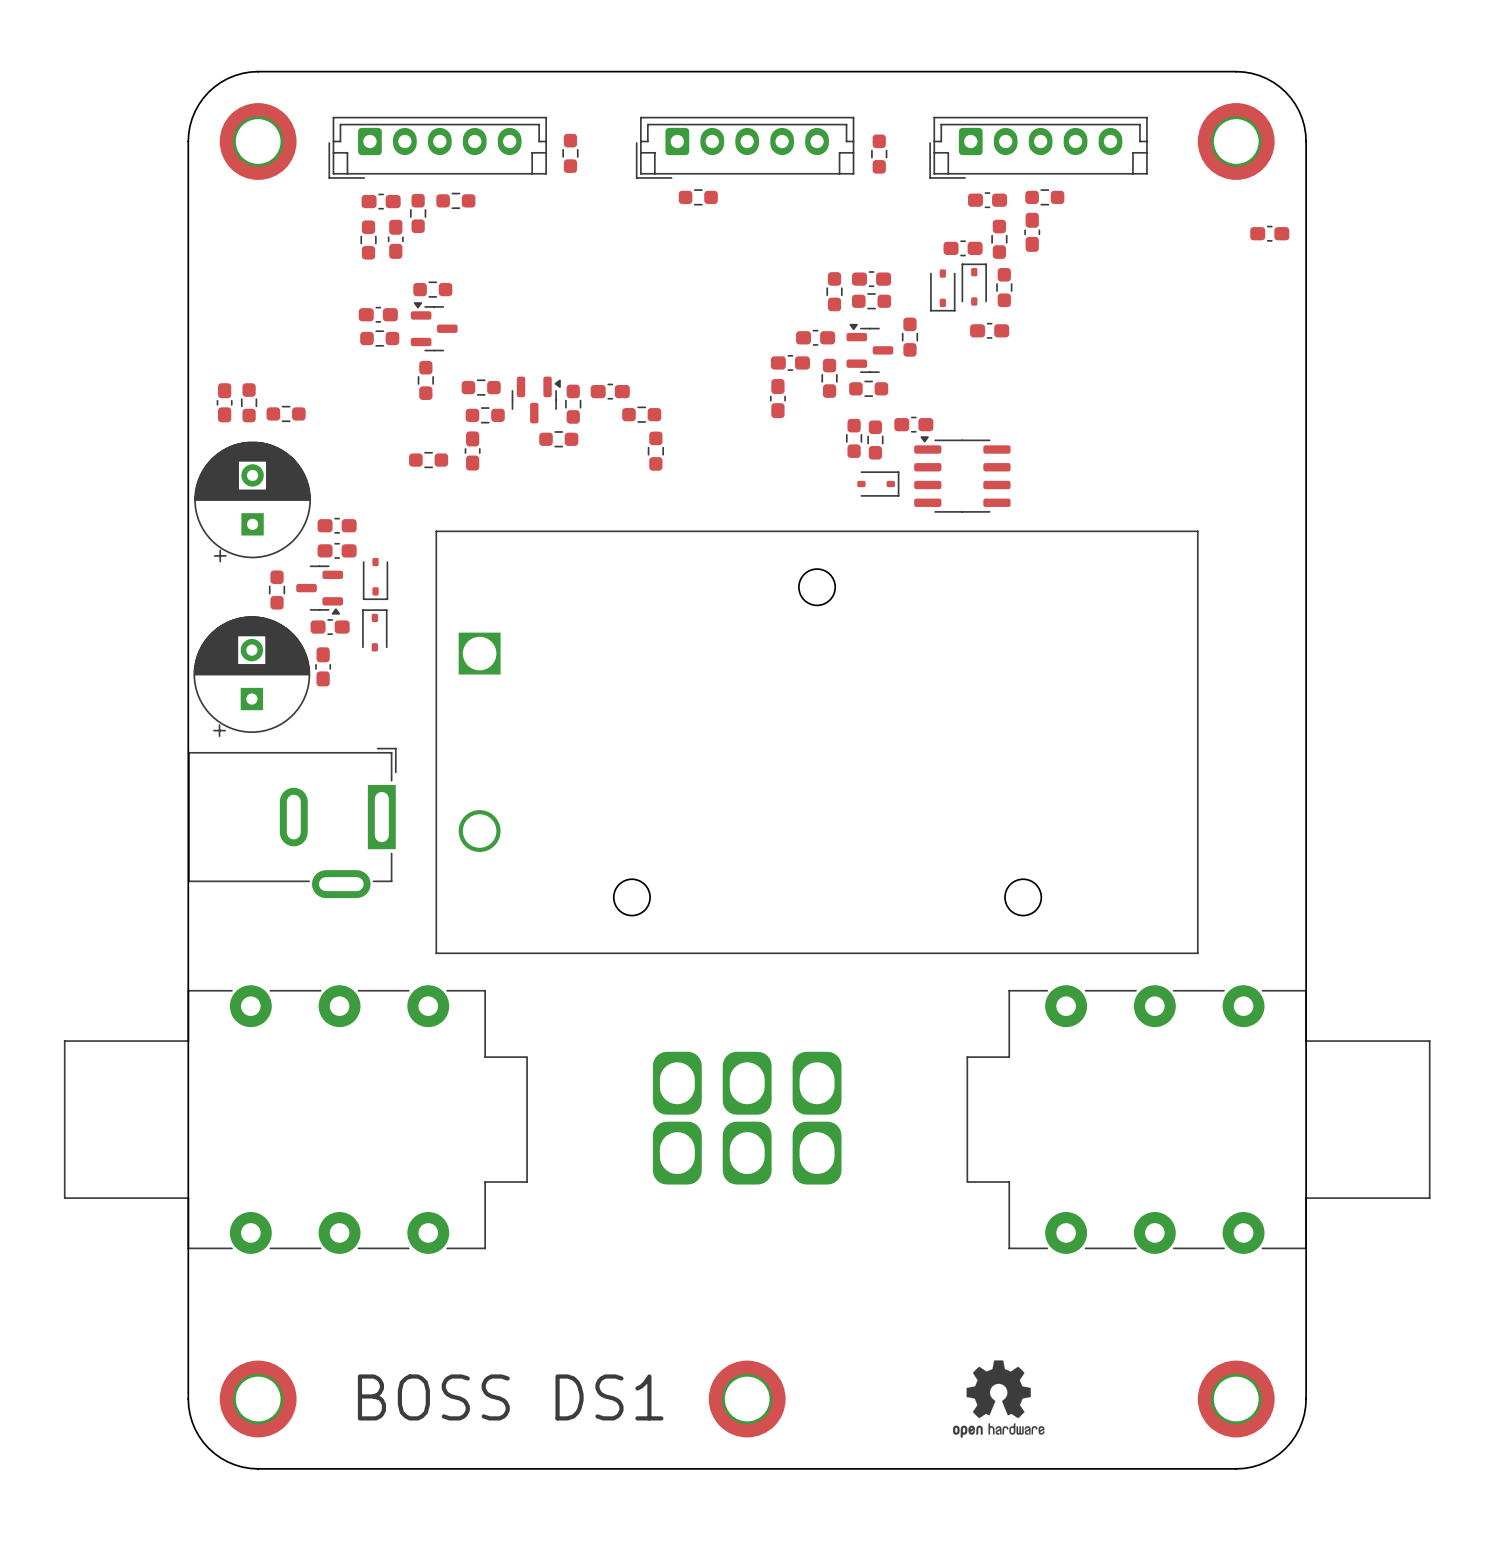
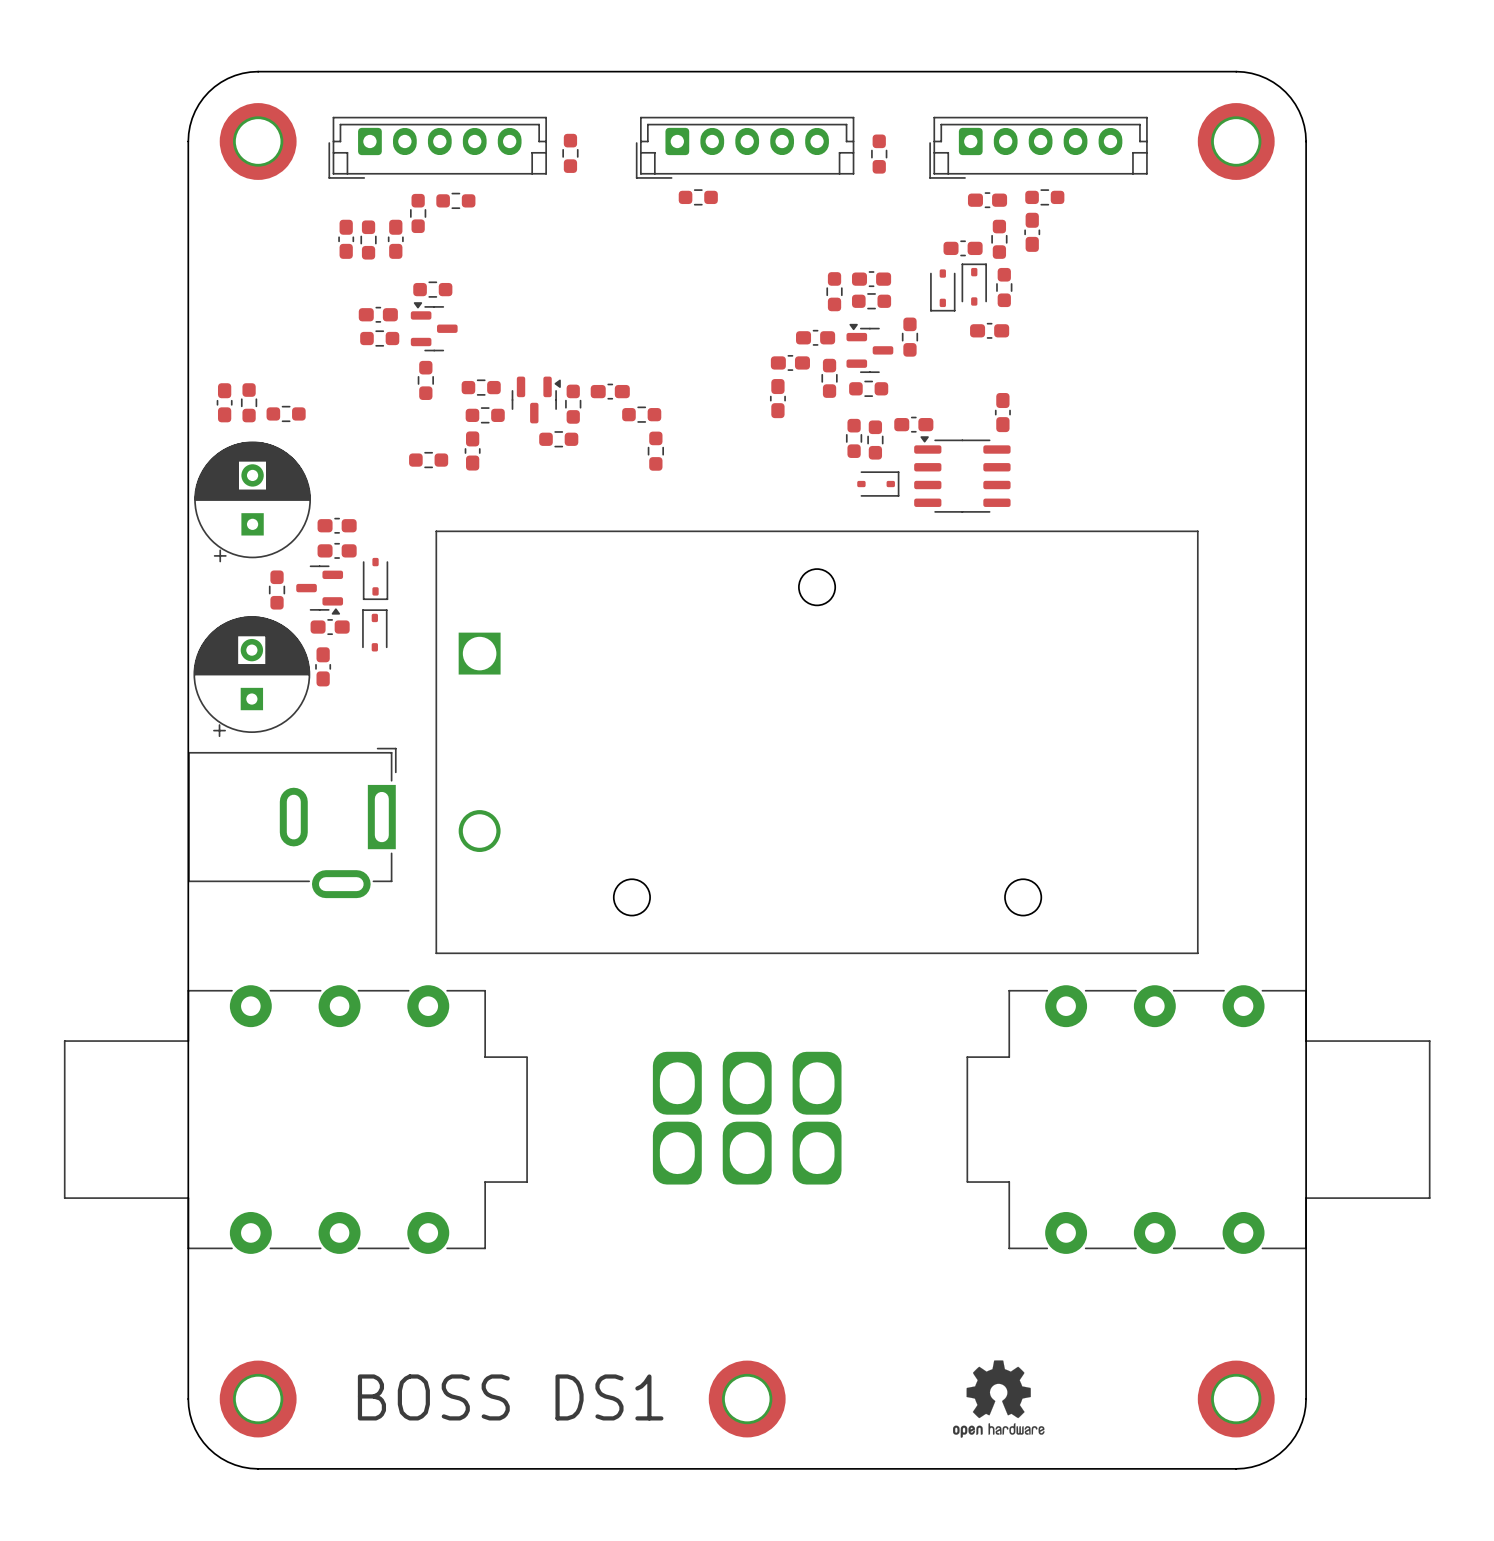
part rotation: 0° (381, 201) -> 90° clockwise (346, 239)
part position: (381, 201) -> (346, 239)
part rotation: 0° (1269, 233) -> 90° clockwise (1002, 412)
part position: (1269, 233) -> (1002, 412)

